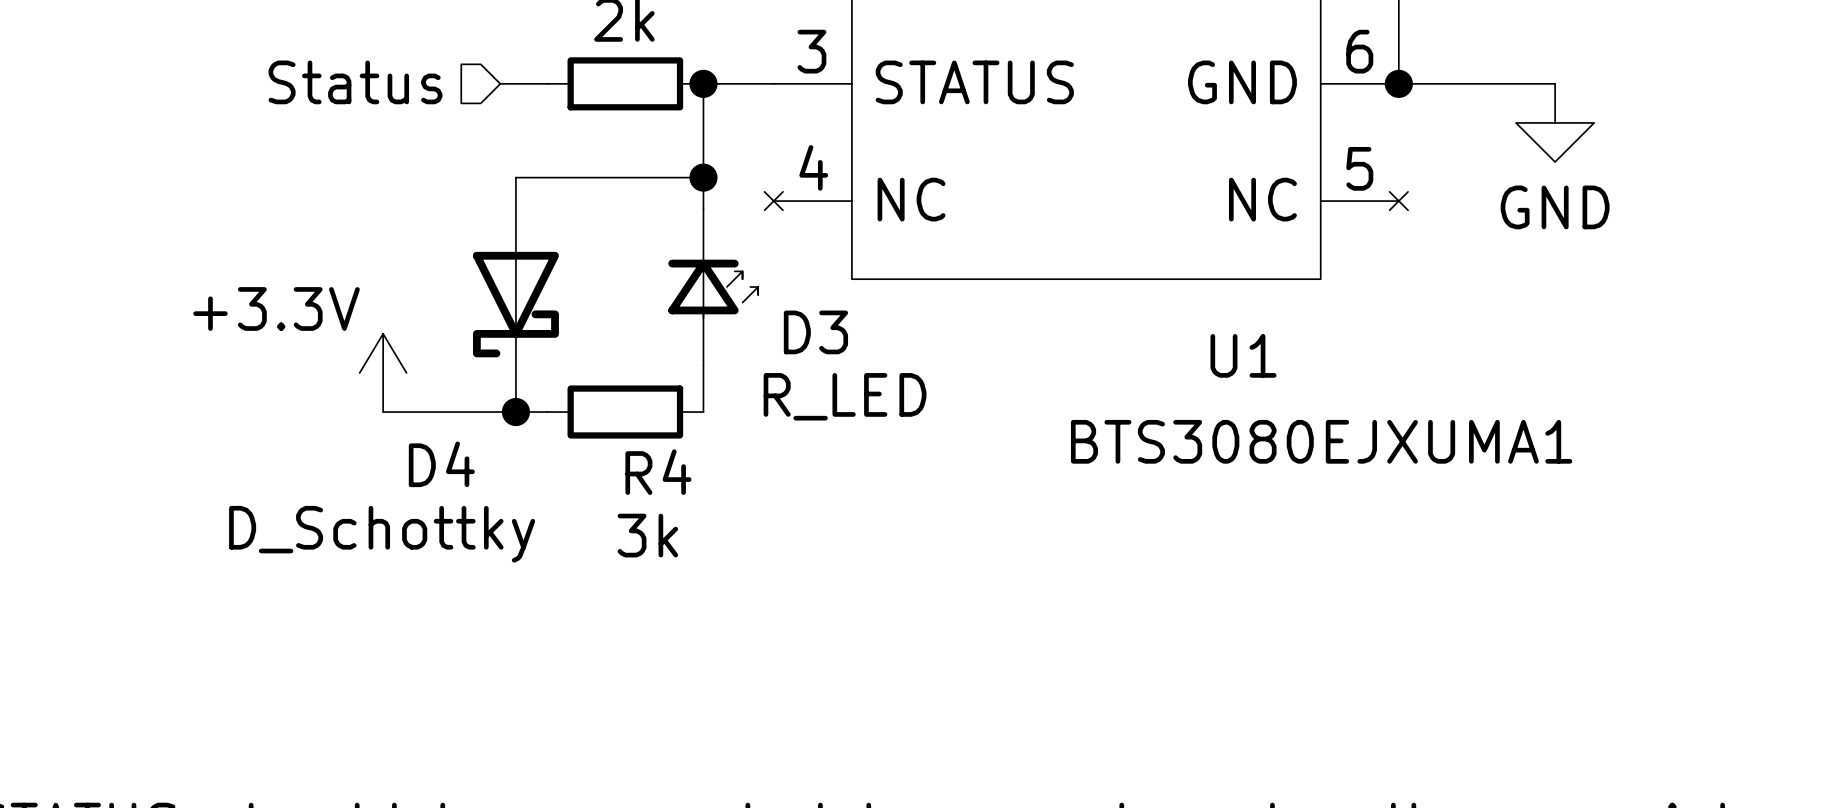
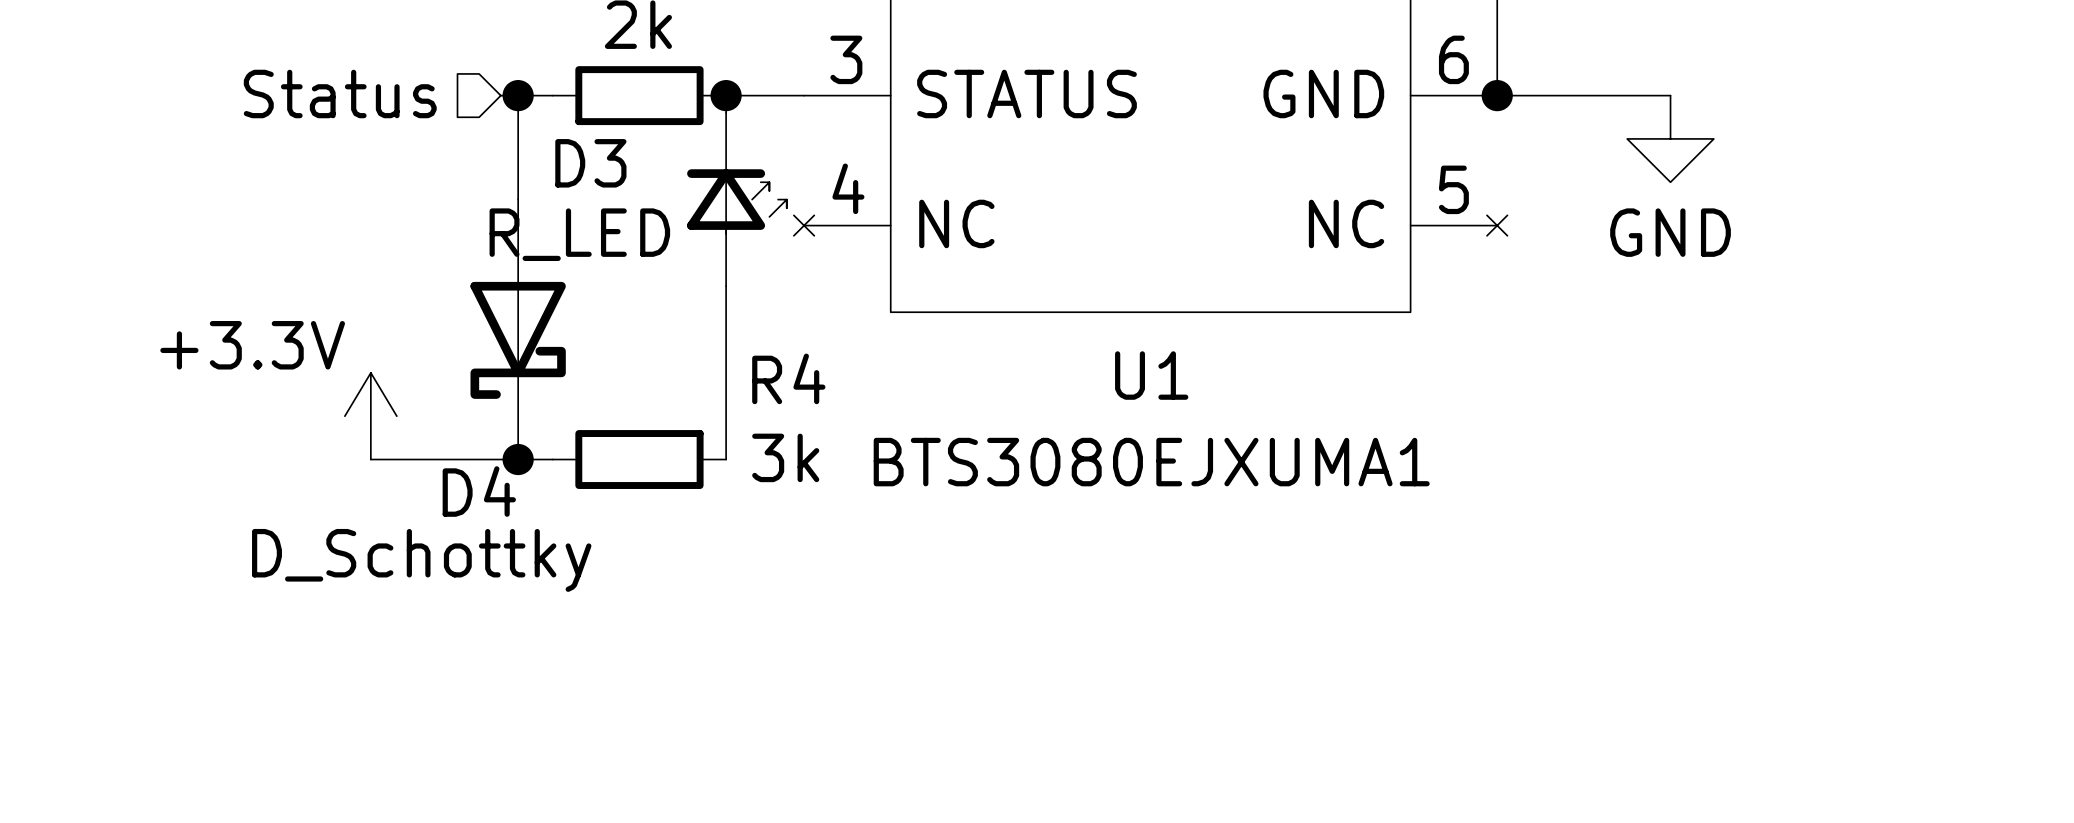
junction: none -> (518, 95)
wire: (515, 177) (703, 177) -> (518, 199) (518, 95)
junction: (703, 177) -> none
D3 position: (713, 287) -> (736, 199)
D3 name position: D3 (815, 332) -> D3 (590, 163)
U1 name position: U1 (1243, 355) -> U1 (1151, 375)
D3 value position: R_LED (845, 396) -> R_LED (579, 234)
U1 value position: BTS3080EJXUMA1 (1321, 441) -> BTS3080EJXUMA1 (1151, 462)
D4 name position: D4 (441, 464) -> D4 (479, 491)
R4 name position: R4 (658, 472) -> R4 (788, 378)
D4 value position: D_Schottky (382, 534) -> D_Schottky (421, 560)
R4 value position: 3k (647, 535) -> 3k (785, 457)

